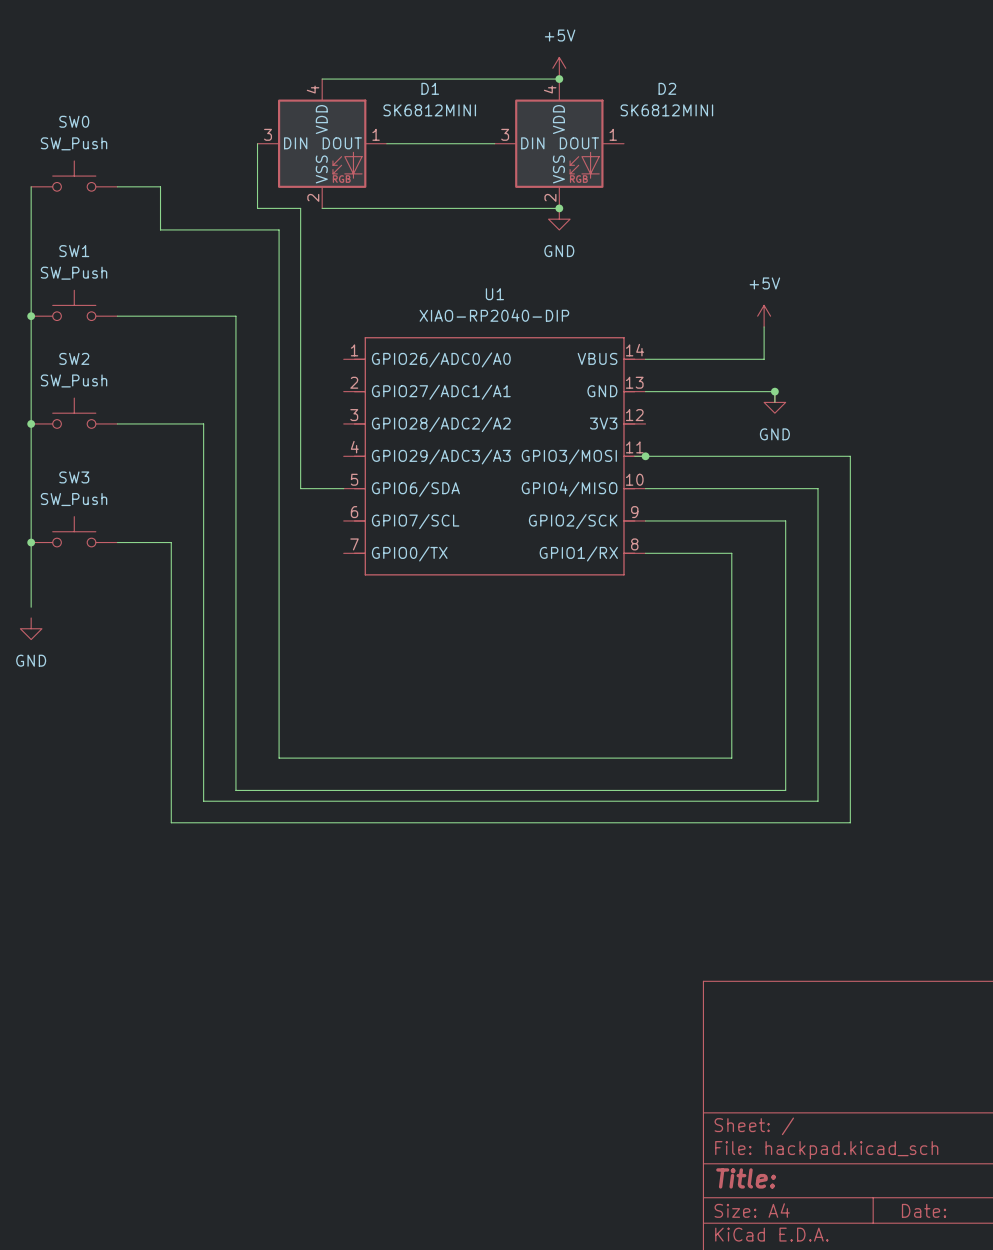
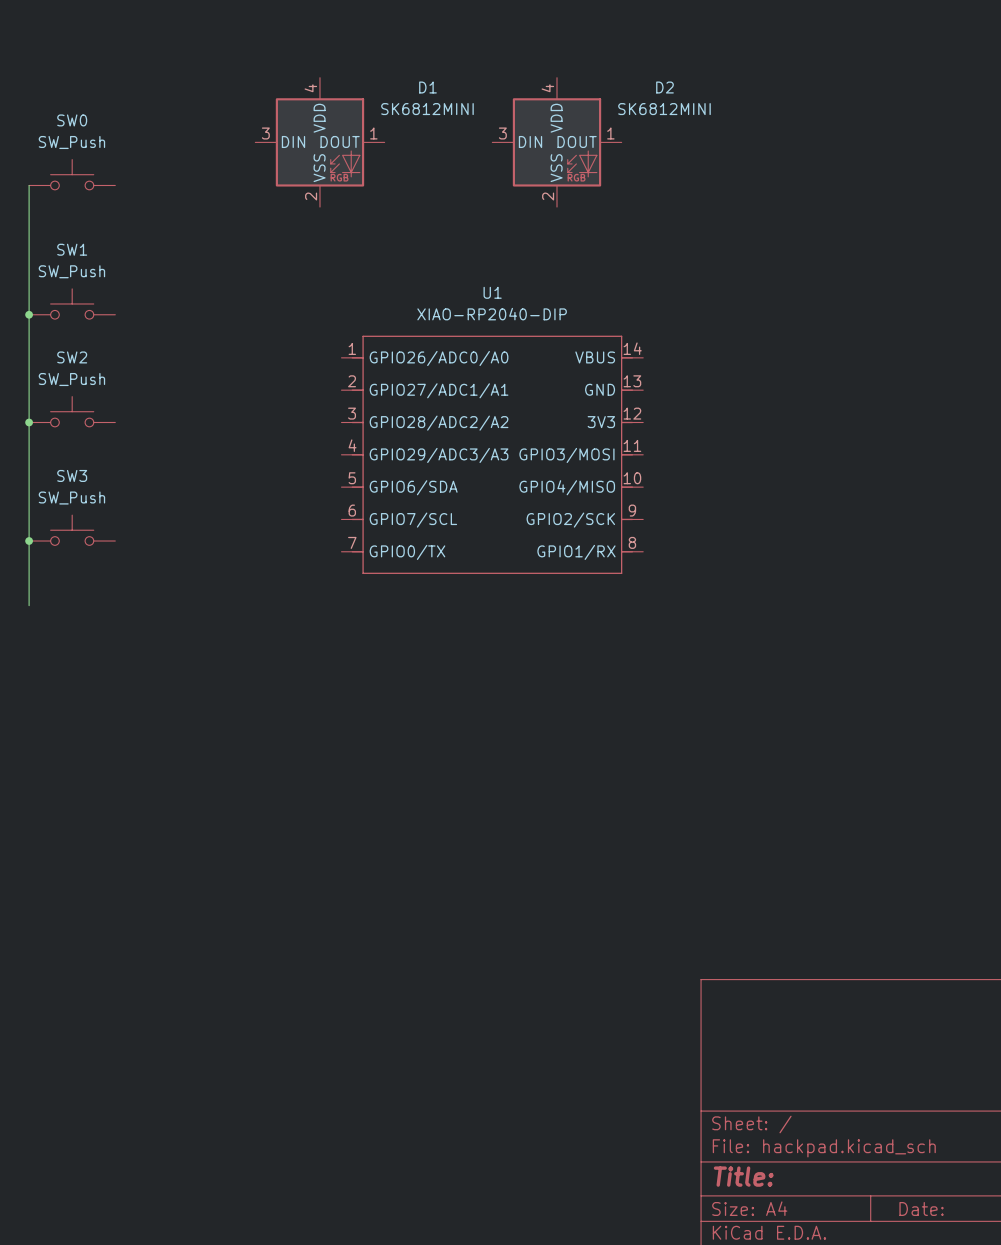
power symbol: +5V (559, 68) -> none
wire: (322, 79) (559, 79) -> none
junction: (559, 79) -> none
wire: (257, 143) (257, 208) (300, 208) (300, 488) (343, 488) -> none
wire: (386, 143) (494, 143) -> none
wire: (117, 186) (160, 186) (160, 229) (279, 229) (279, 758) (731, 758) (731, 553) (645, 553) -> none
wire: (322, 208) (559, 208) -> none
junction: (559, 208) -> none
power symbol: GND (559, 219) -> none
wire: (117, 316) (235, 316) (235, 790) (785, 790) (785, 520) (645, 520) -> none
power symbol: +5V (764, 316) -> none
wire: (764, 326) (764, 359) (645, 359) -> none
wire: (645, 391) (774, 391) (774, 402) -> none
junction: (774, 391) -> none
power symbol: GND (774, 402) -> none
wire: (117, 423) (203, 423) (203, 801) (818, 801) (818, 488) (645, 488) -> none
wire: (634, 456) (850, 456) (850, 822) (171, 822) (171, 542) (117, 542) -> none
junction: (645, 456) -> none
power symbol: GND (31, 628) -> none

